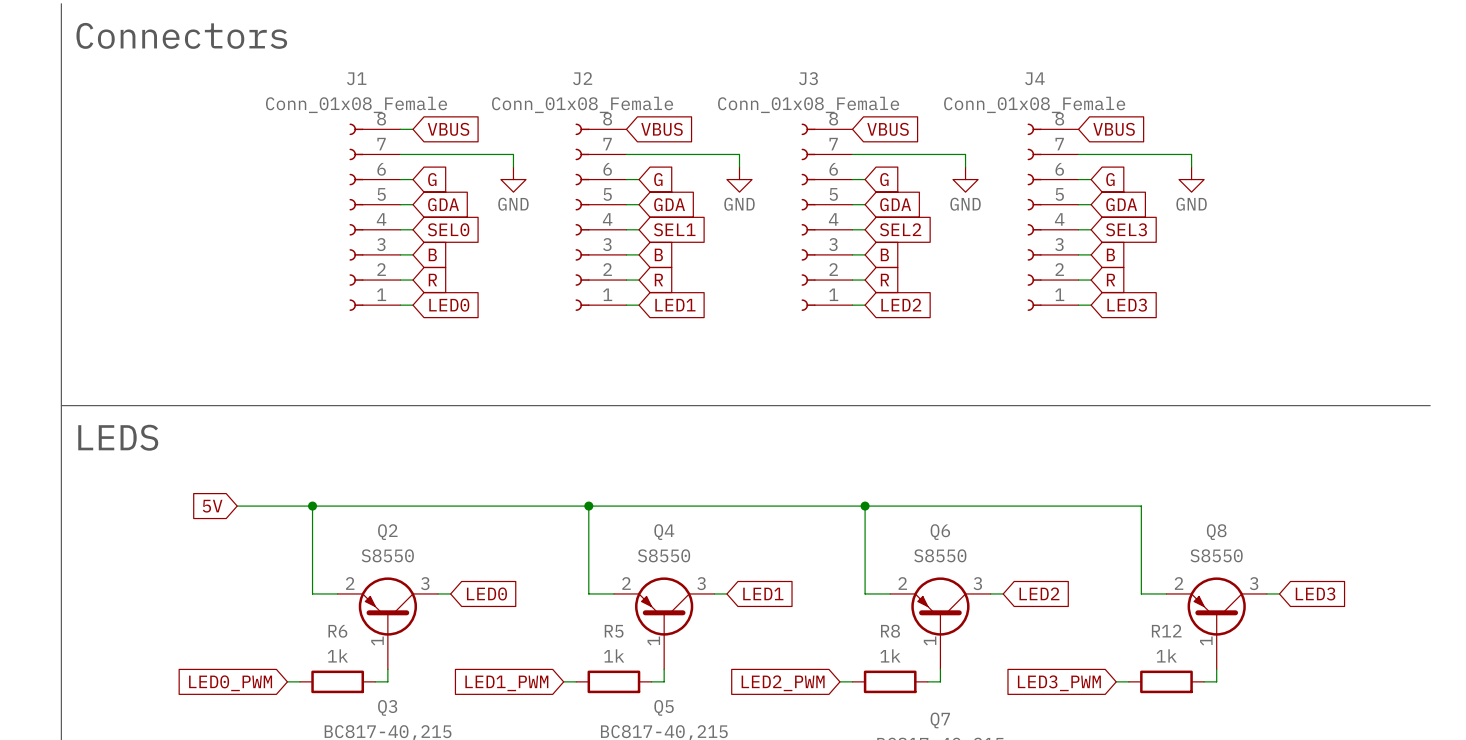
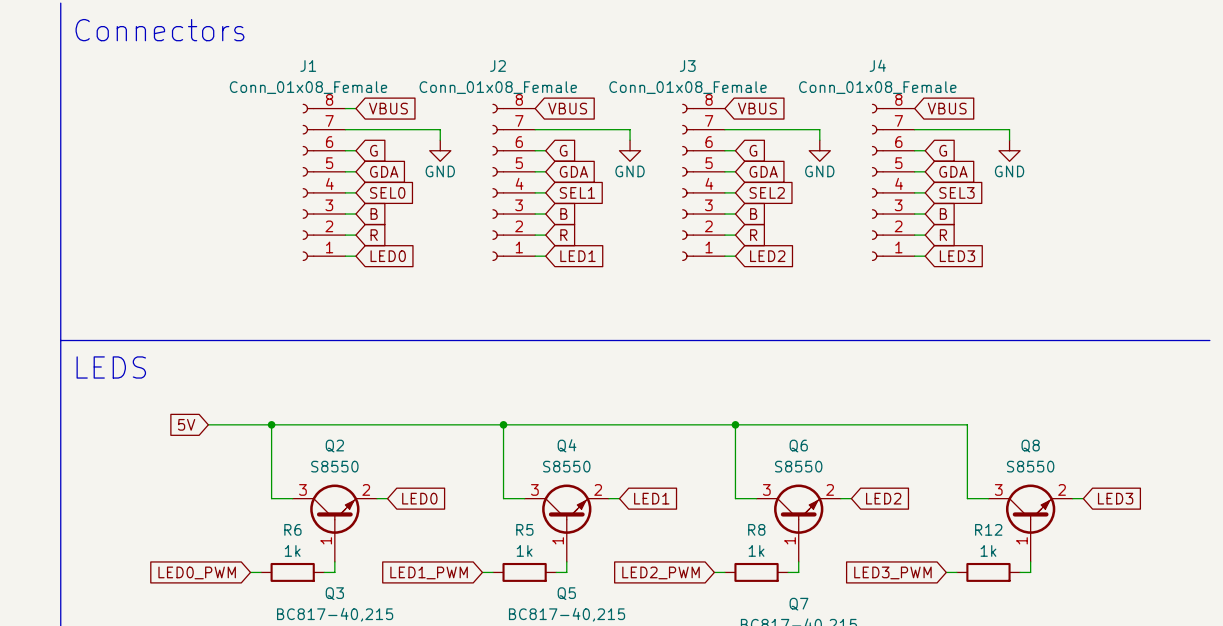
Q2 symbol: [337, 577, 439, 670] -> [292, 484, 378, 562]
Q4 symbol: [613, 577, 715, 670] -> [524, 484, 609, 562]
Q6 symbol: [890, 577, 991, 670] -> [756, 484, 841, 562]
Q8 symbol: [1166, 577, 1267, 670] -> [988, 484, 1073, 562]

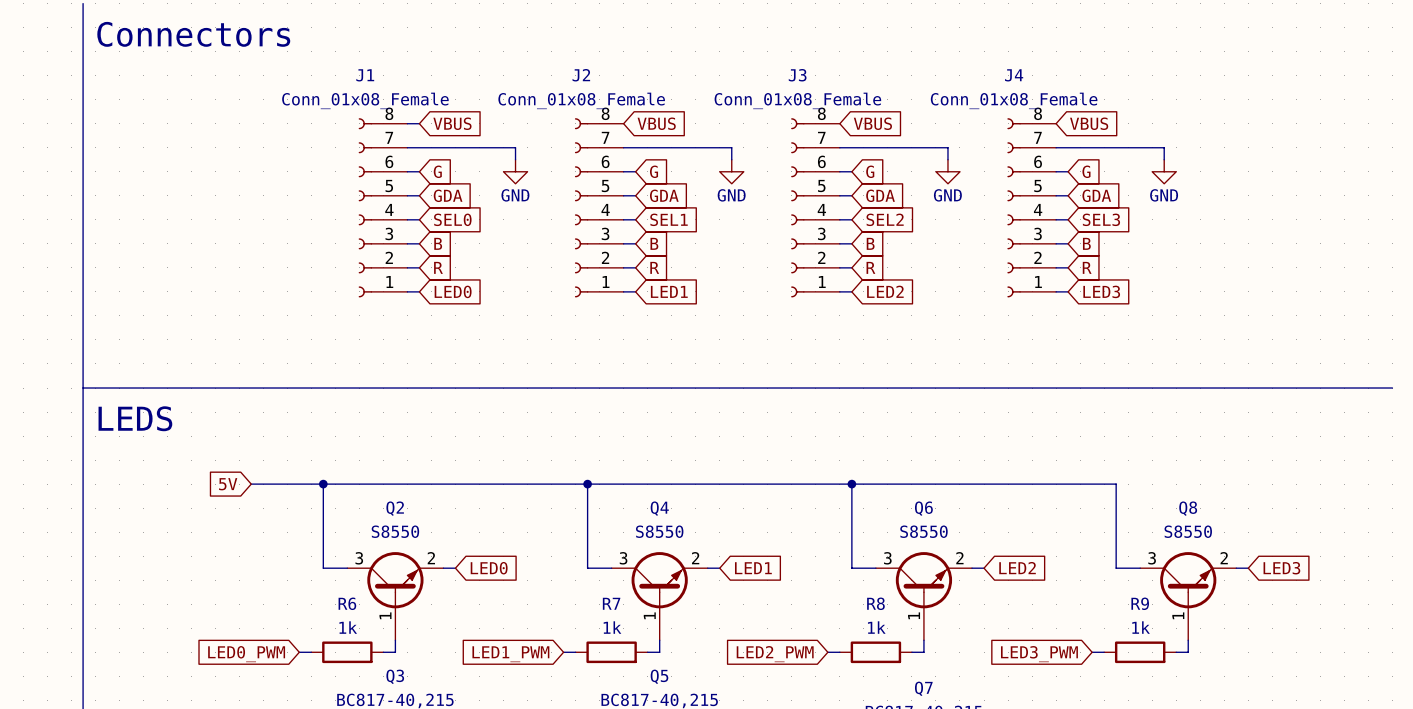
R5 name: R5 (524, 529) -> R7 (611, 603)
R12 name: R12 (988, 529) -> R9 (1140, 603)

